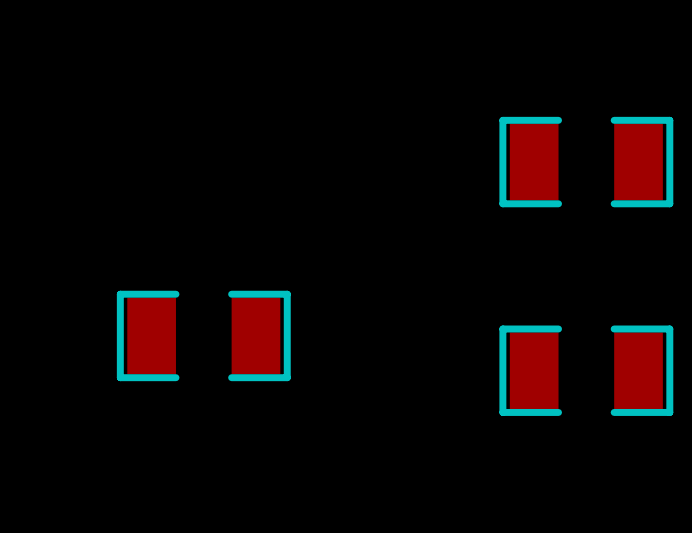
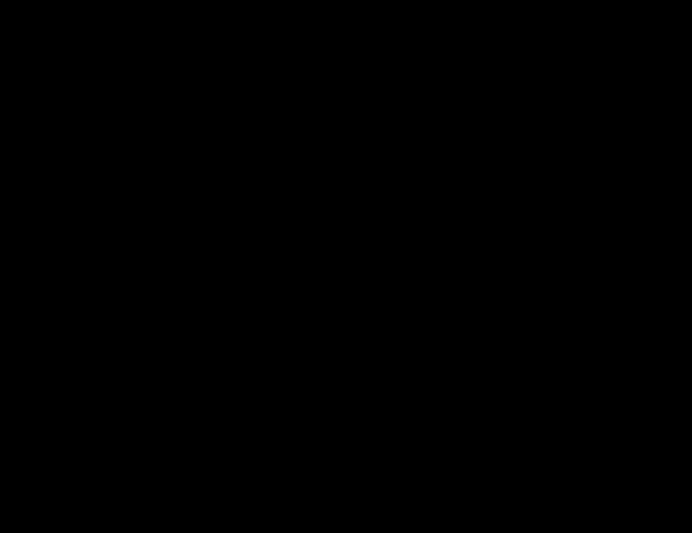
part: (586, 162) -> none
part: (203, 335) -> none
part: (586, 370) -> none

